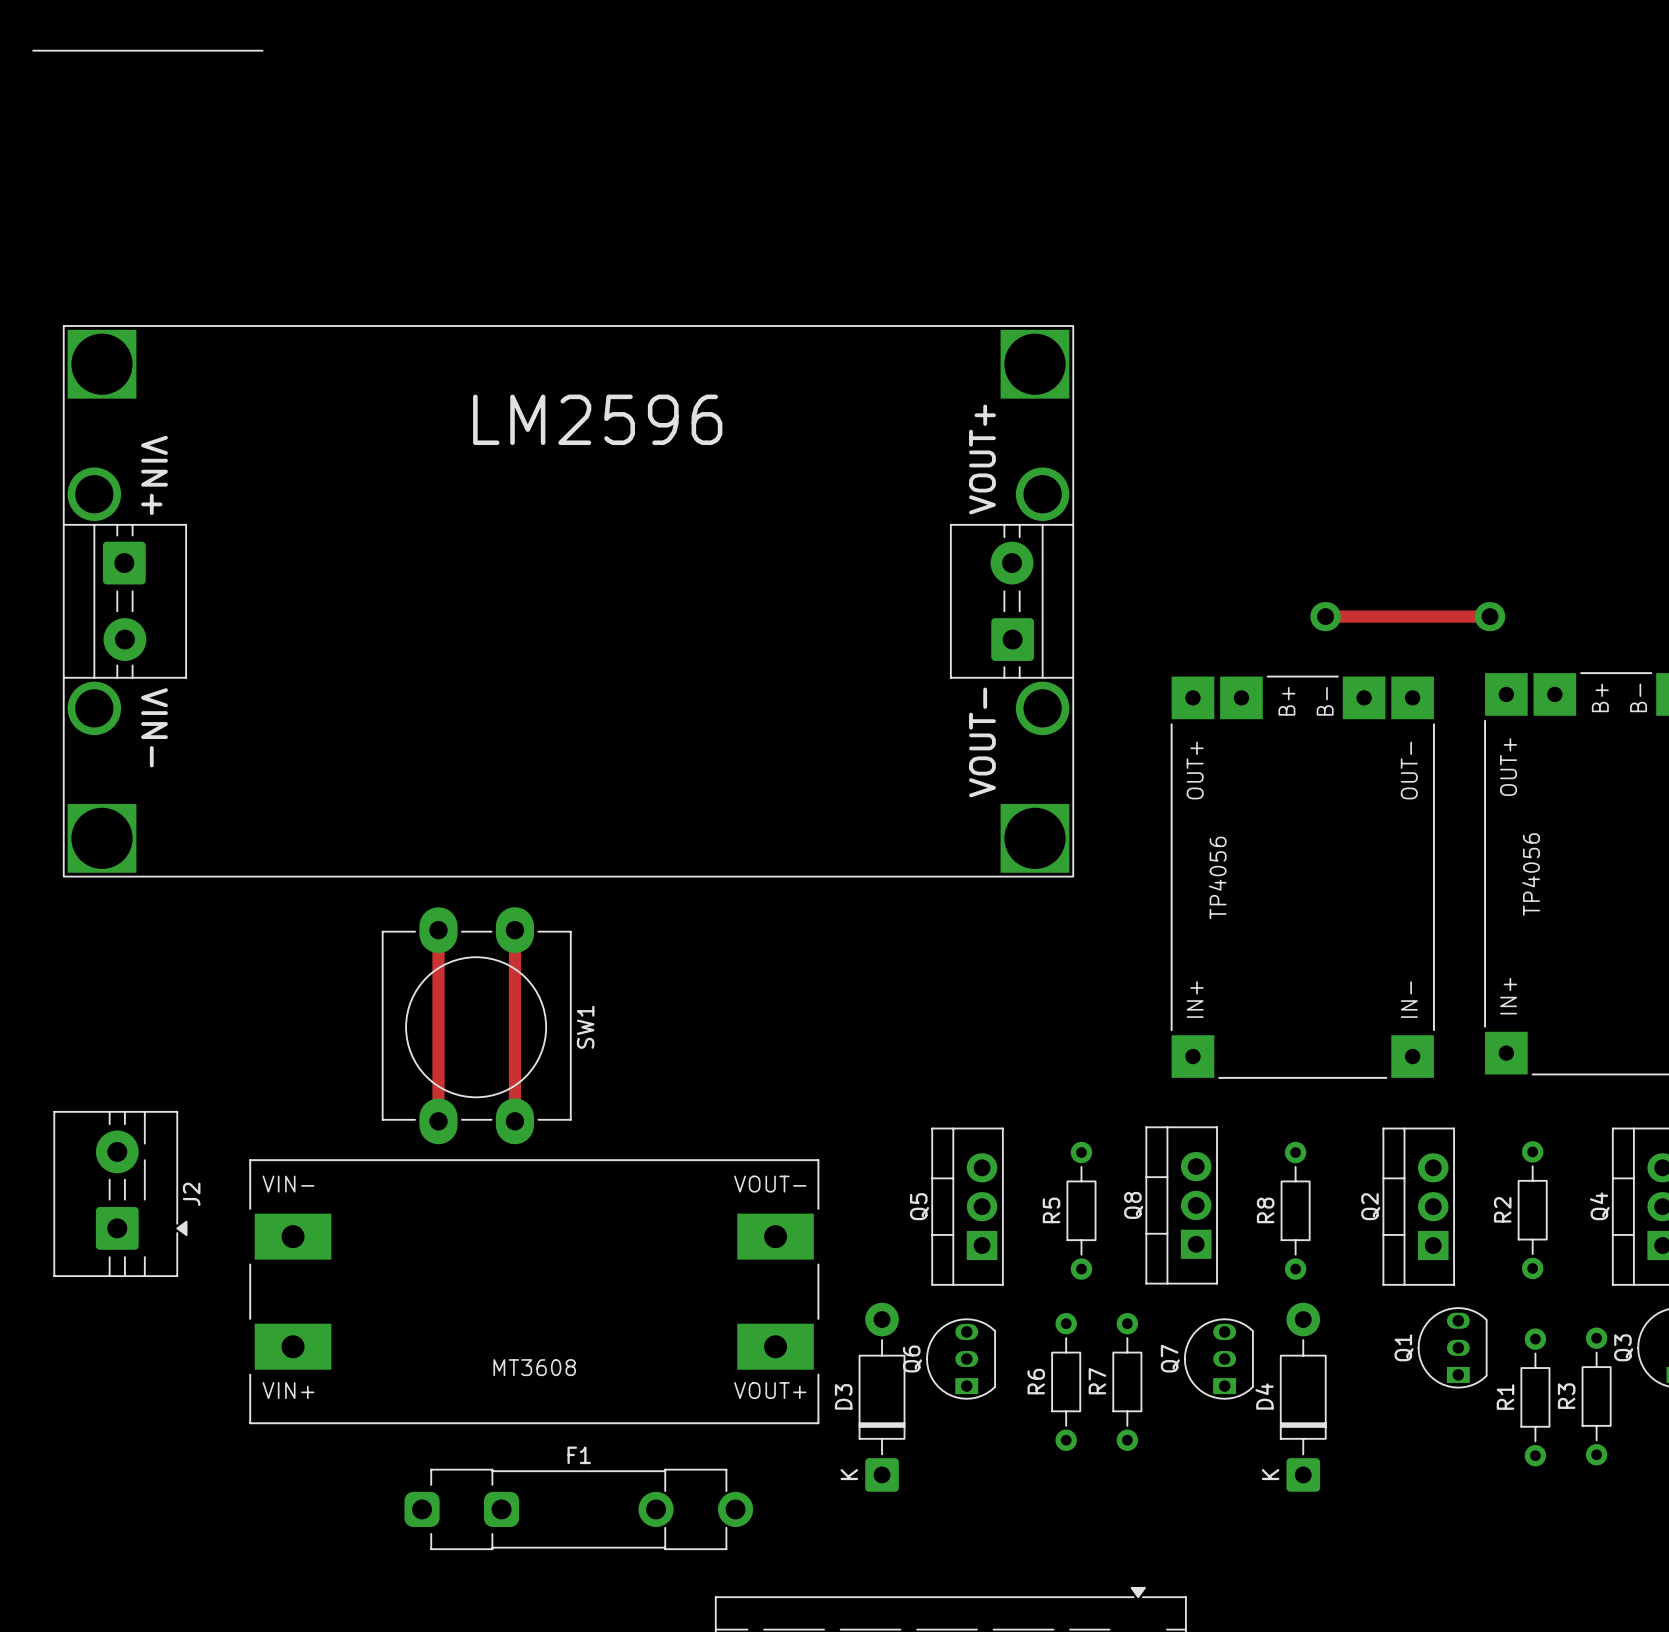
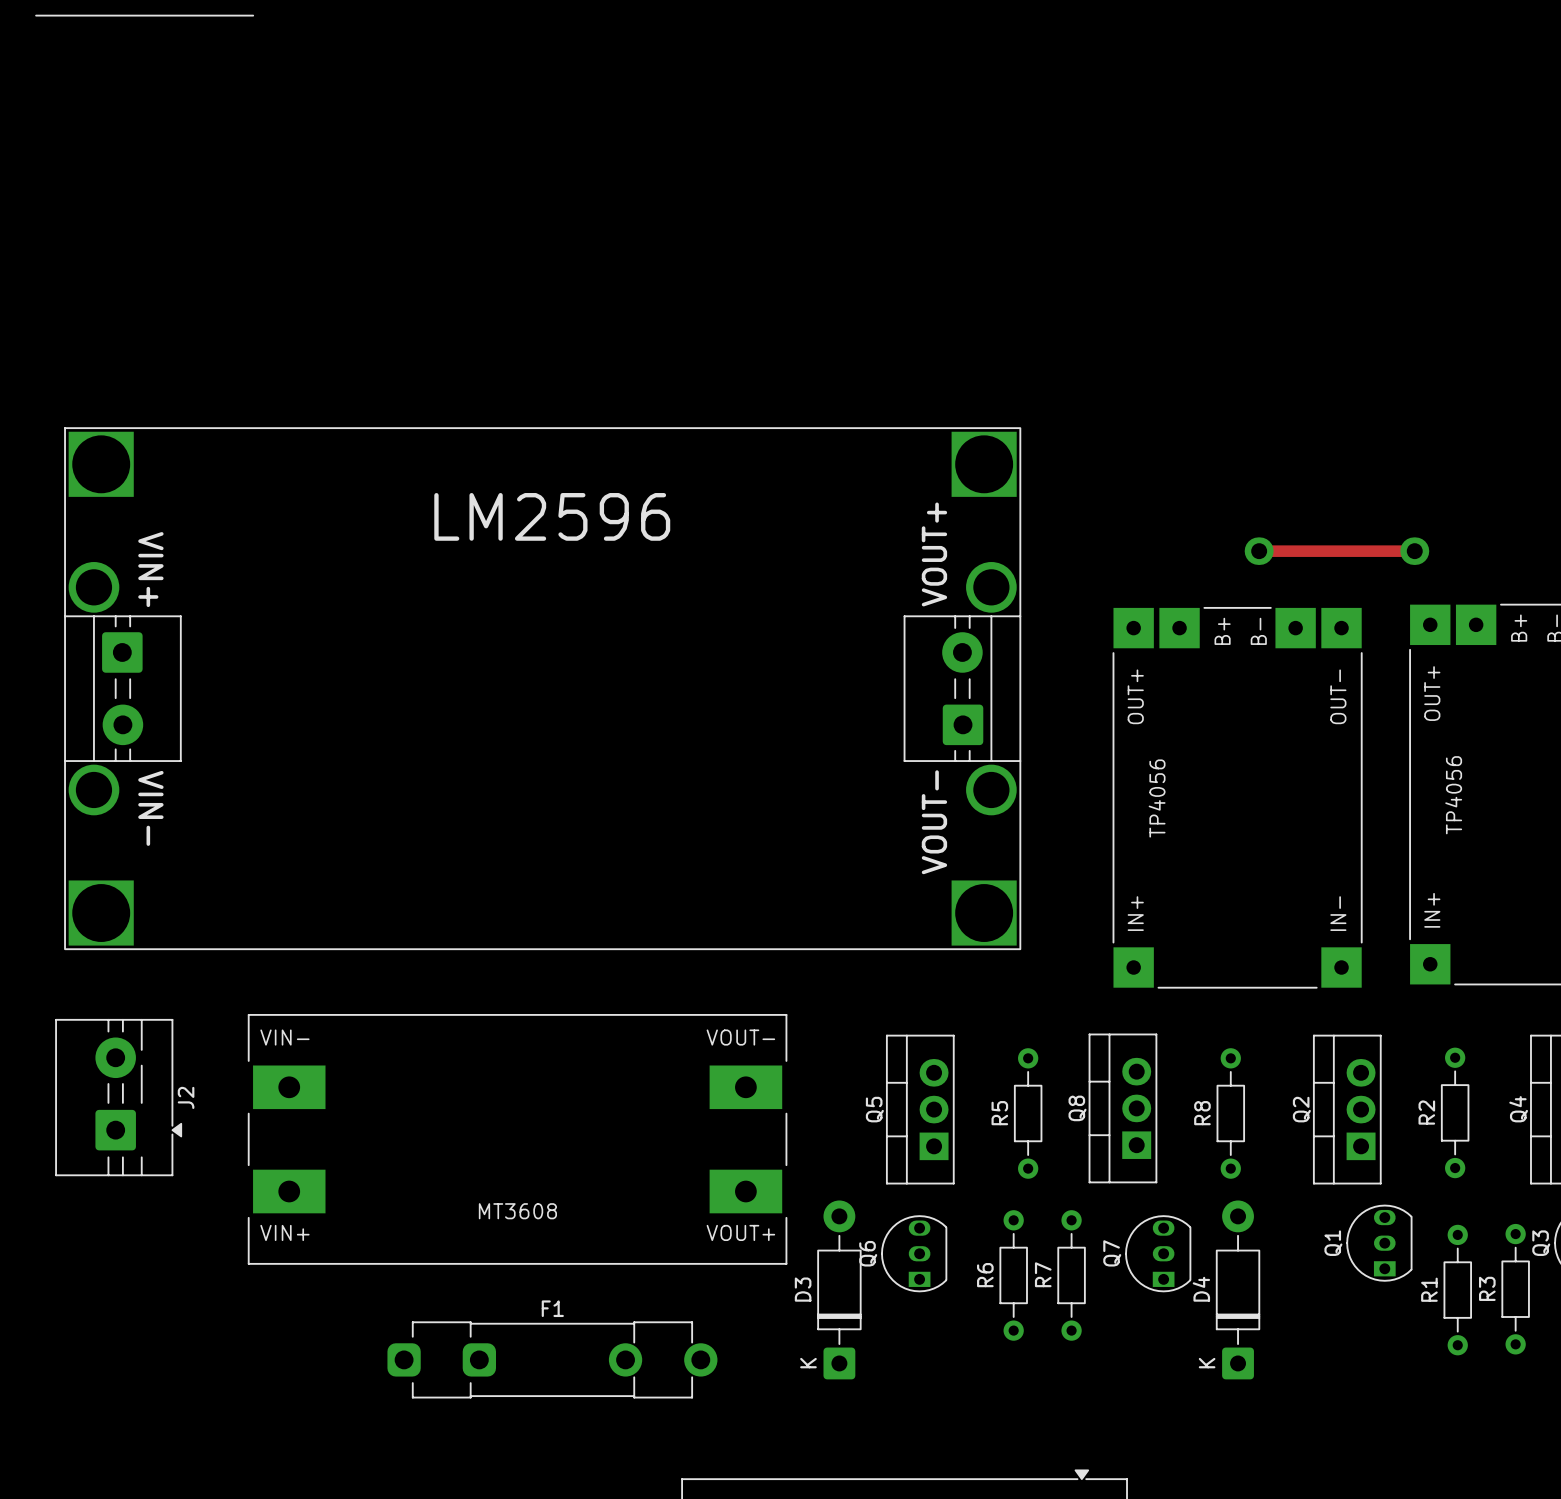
part: (568, 601) -> none
part: none -> (542, 688)
track: (438, 930) (438, 1121) -> none
track: (514, 930) (514, 1121) -> none
SW1: (476, 1025) -> none
part position: (534, 1291) -> (517, 1139)
F1 position: (578, 1509) -> (552, 1359)

